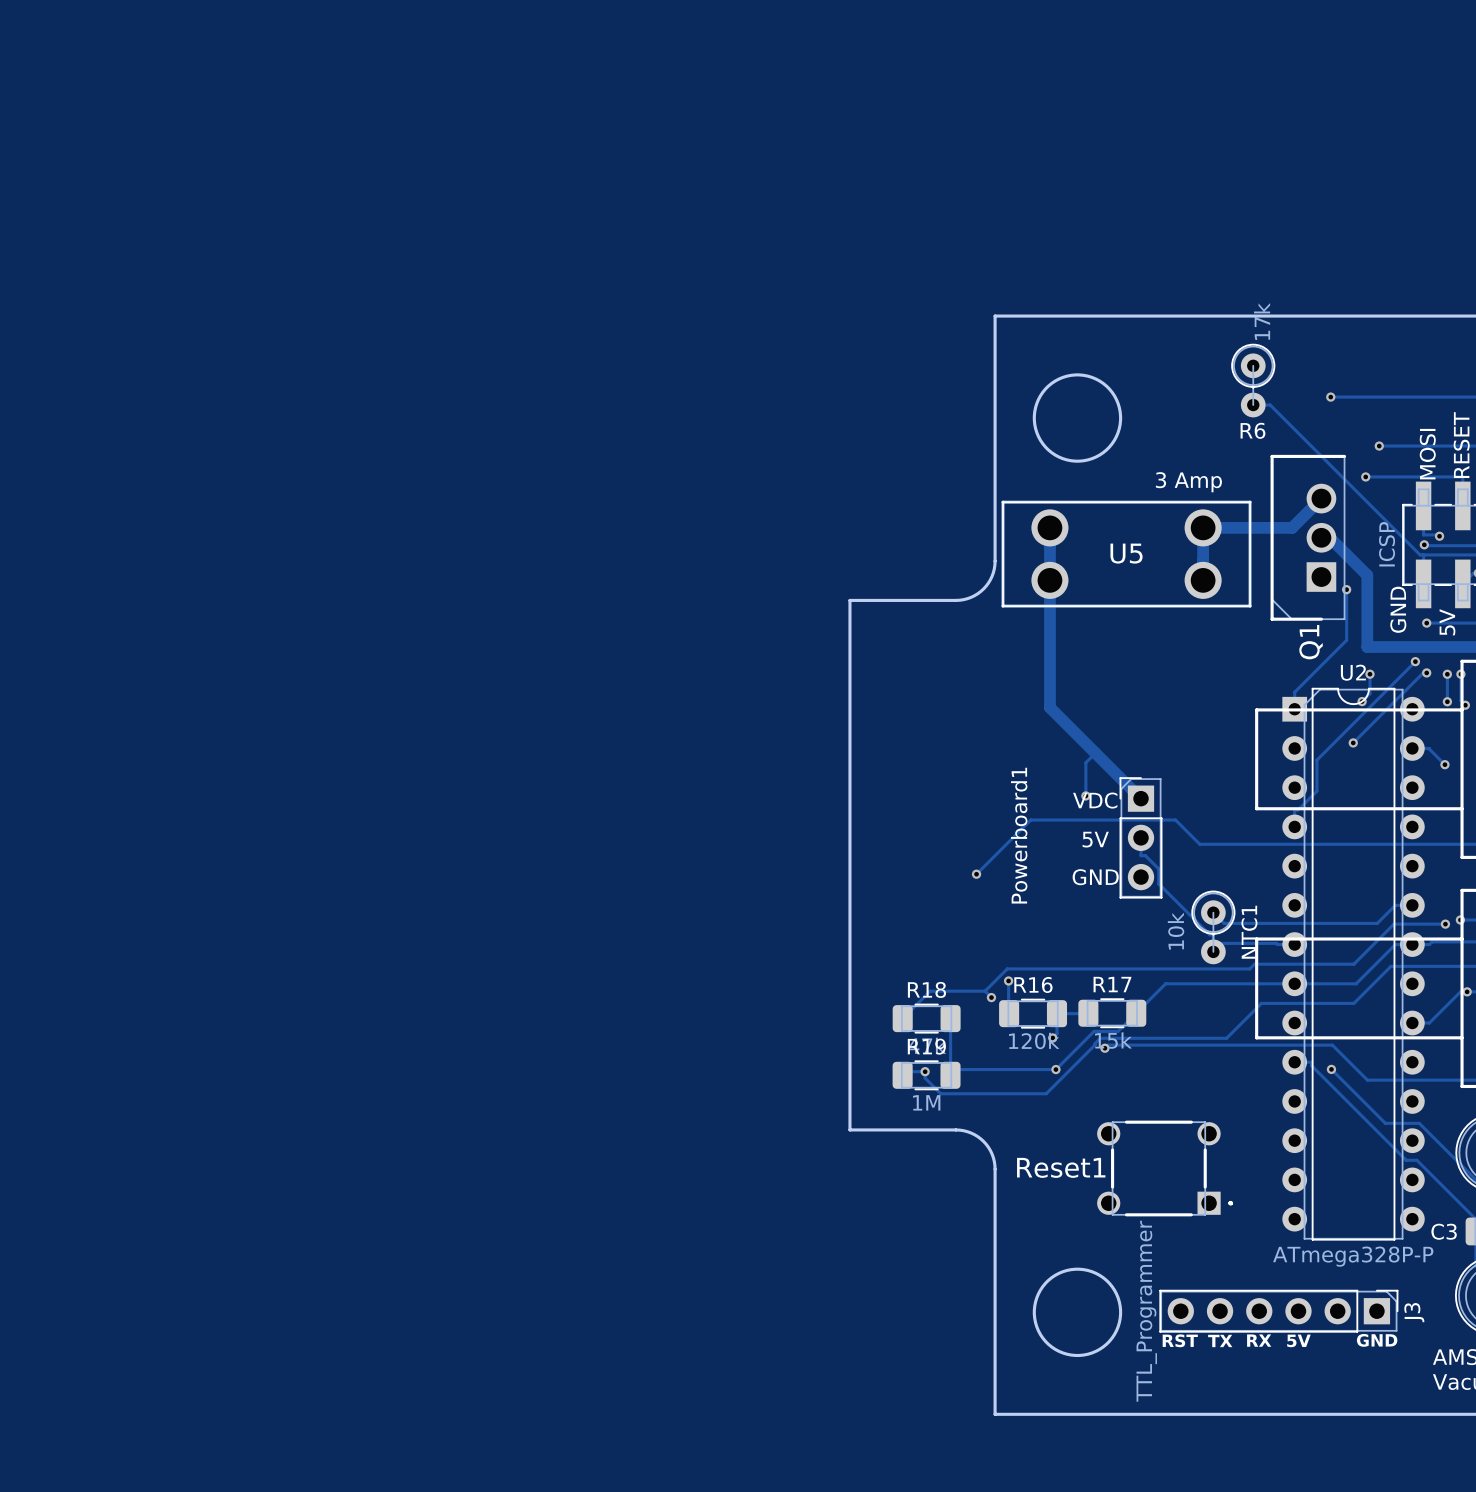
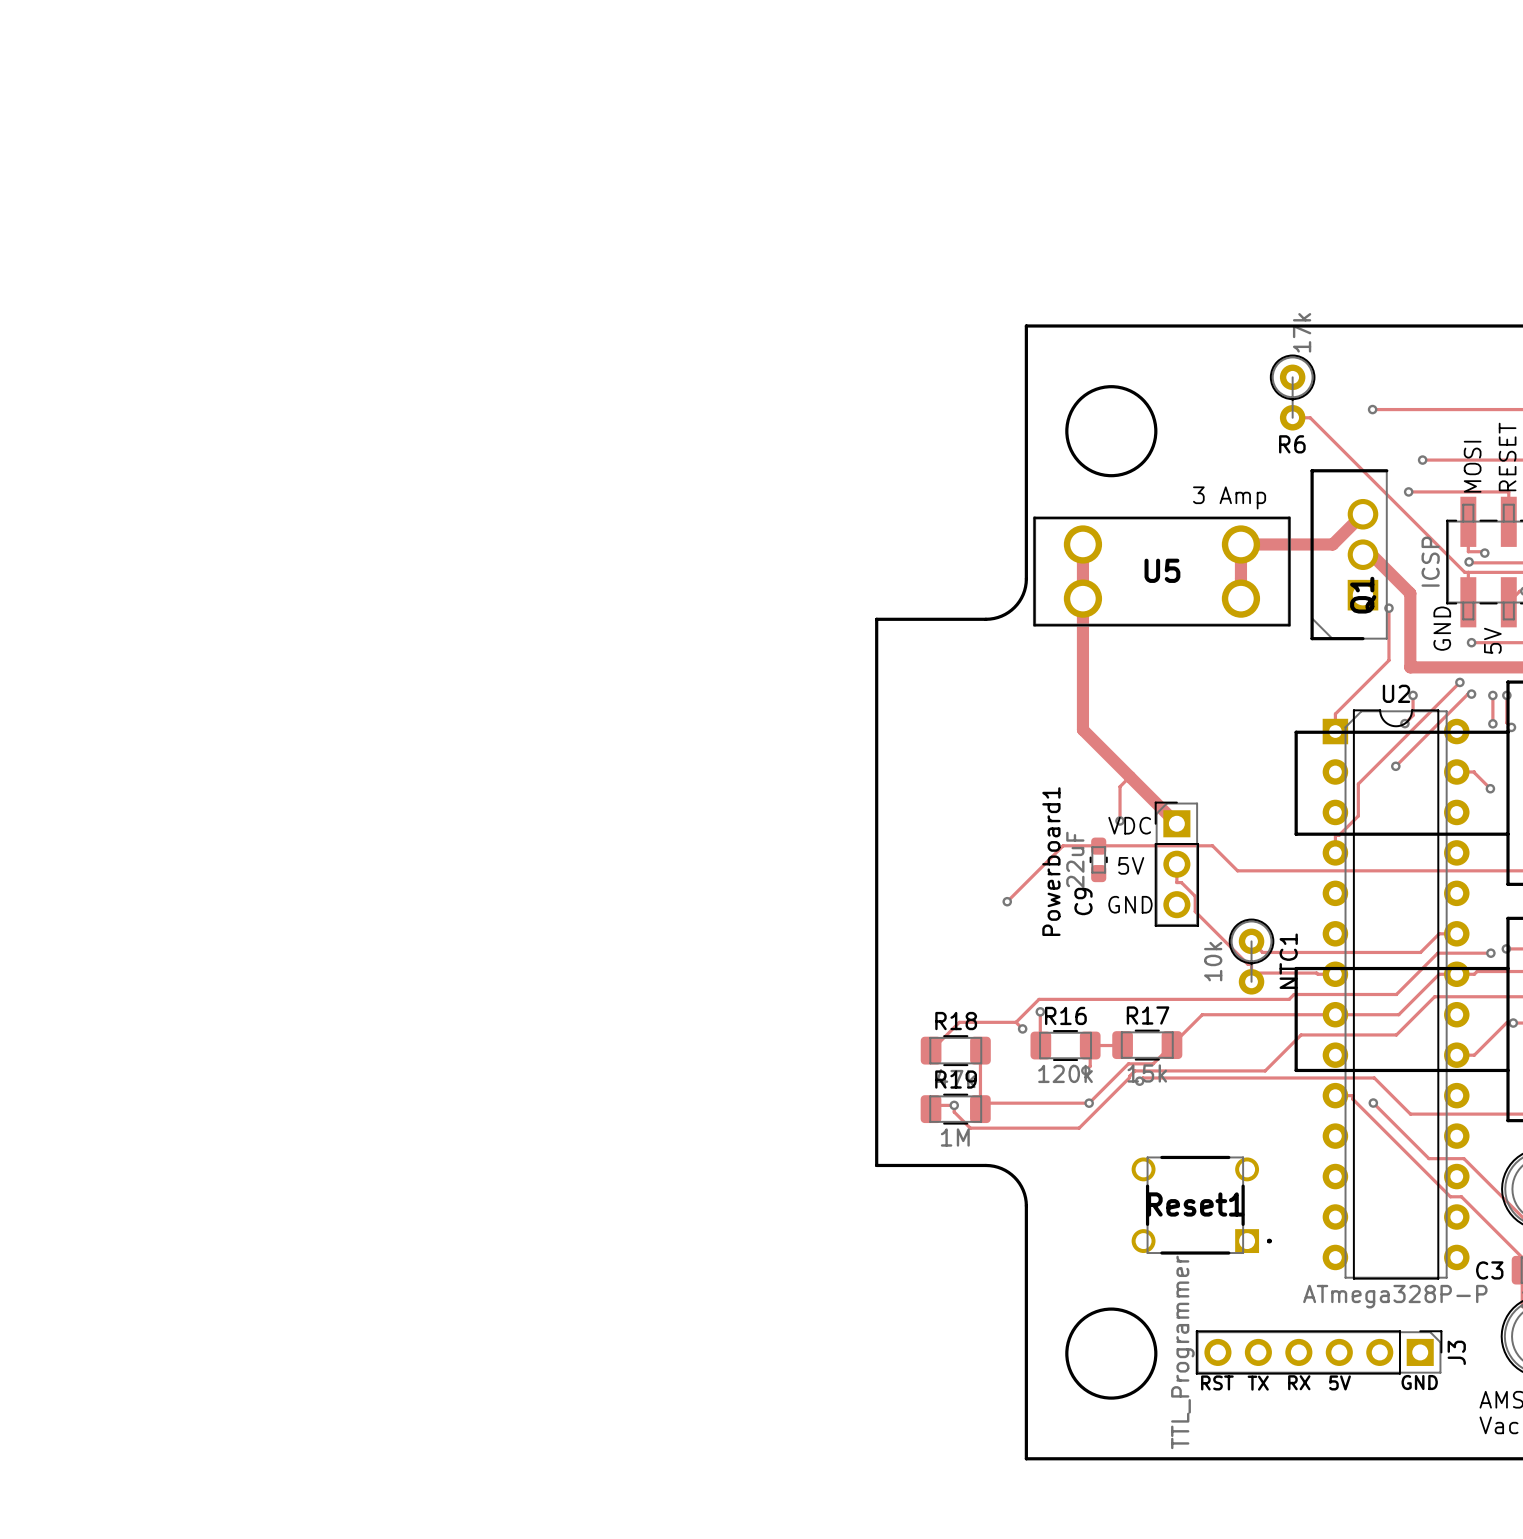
Q1 name position: Q1 (1311, 642) -> Q1 (1363, 595)
C9: none -> 22uF (1098, 859)
Reset1 name position: Reset1 (1061, 1167) -> Reset1 (1195, 1204)

